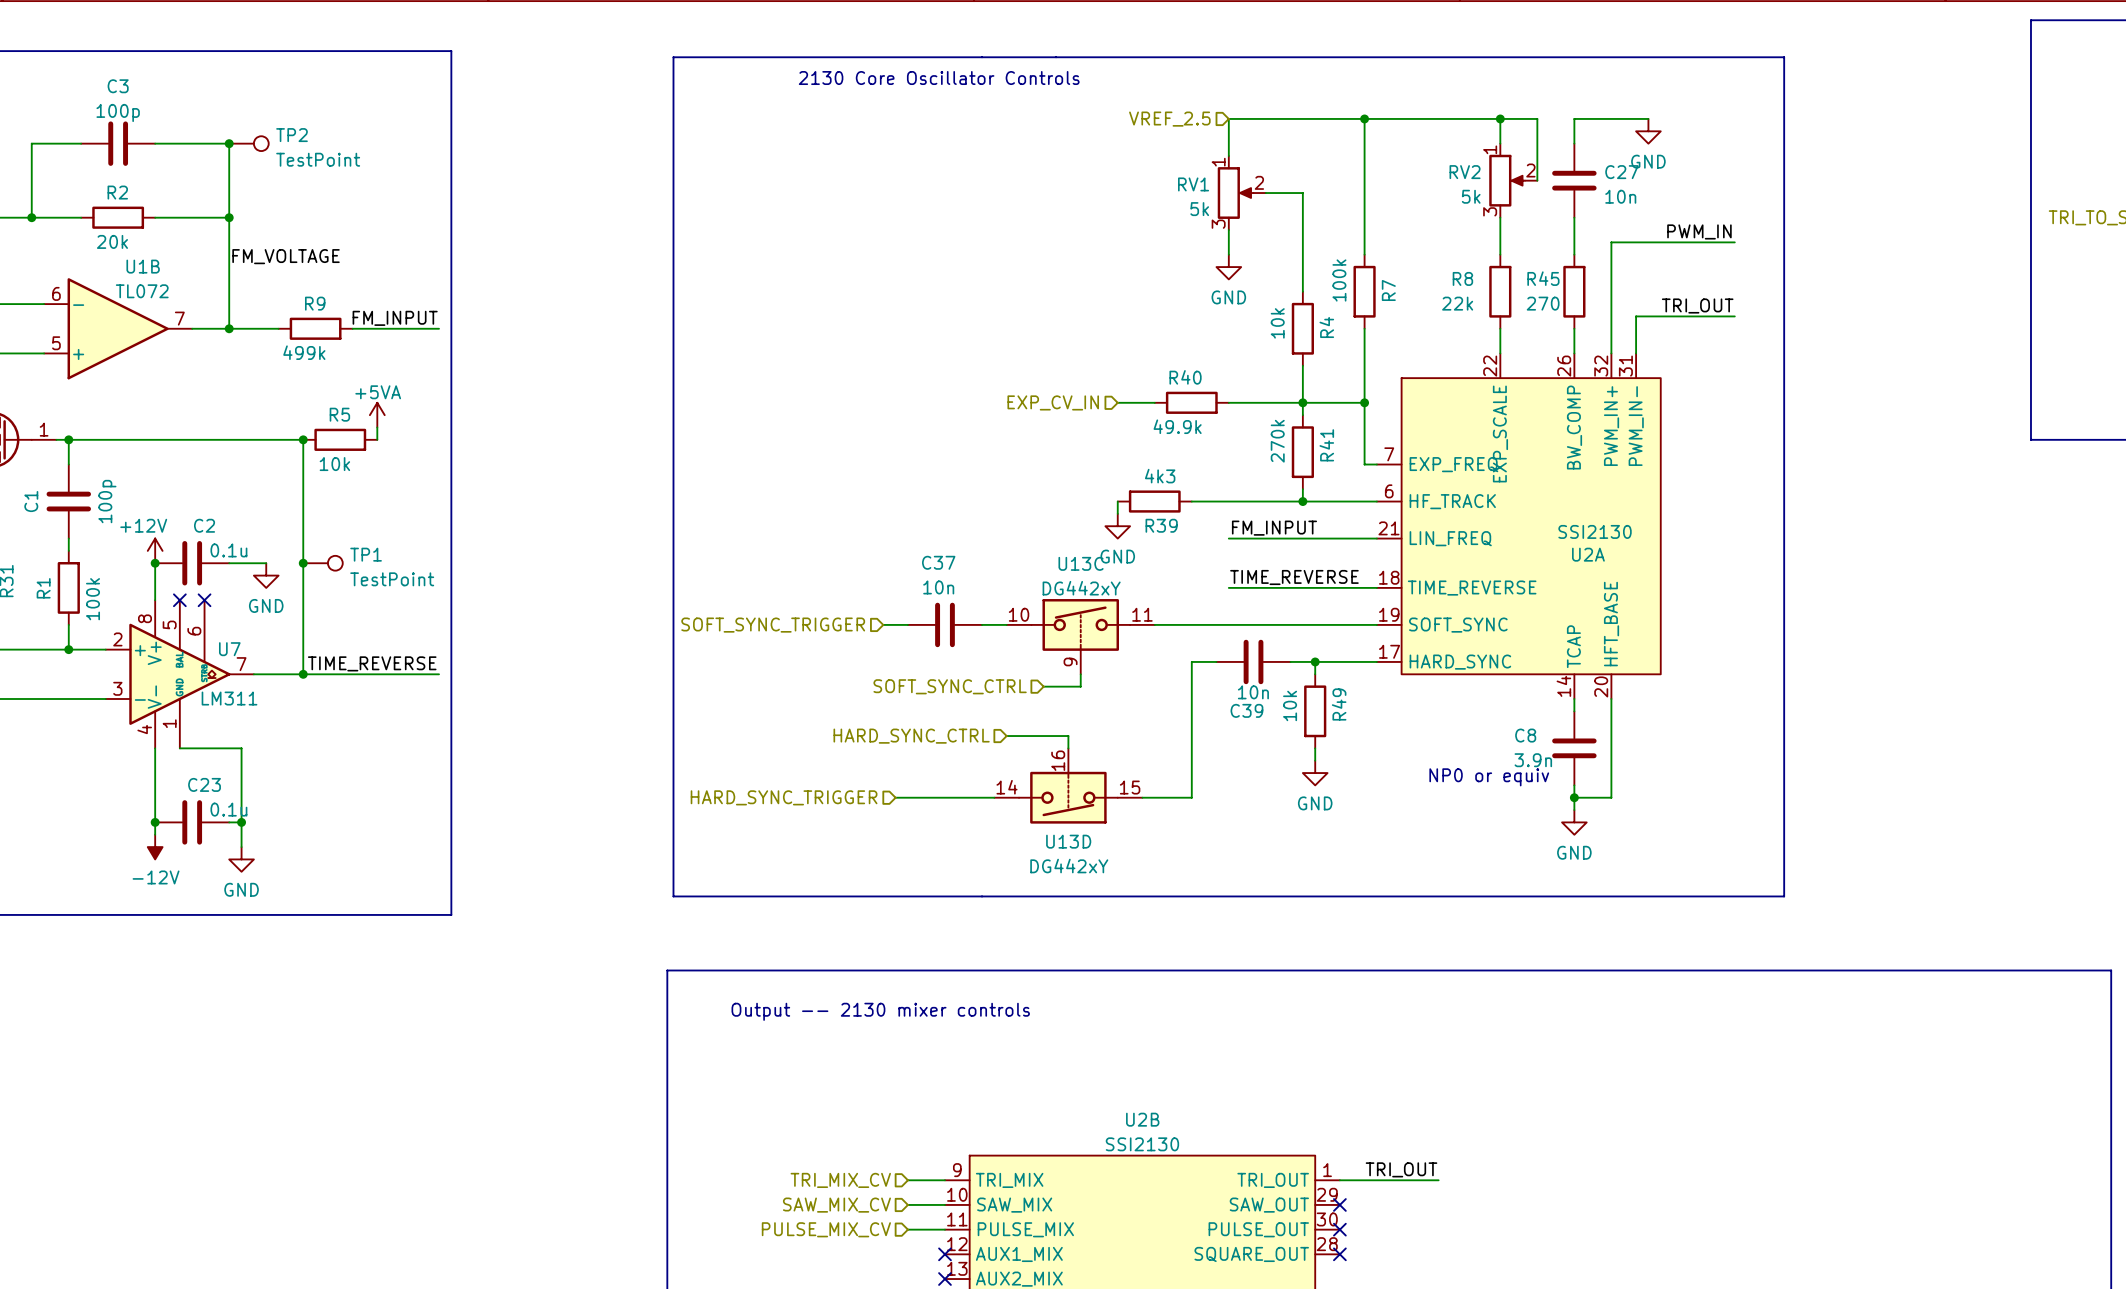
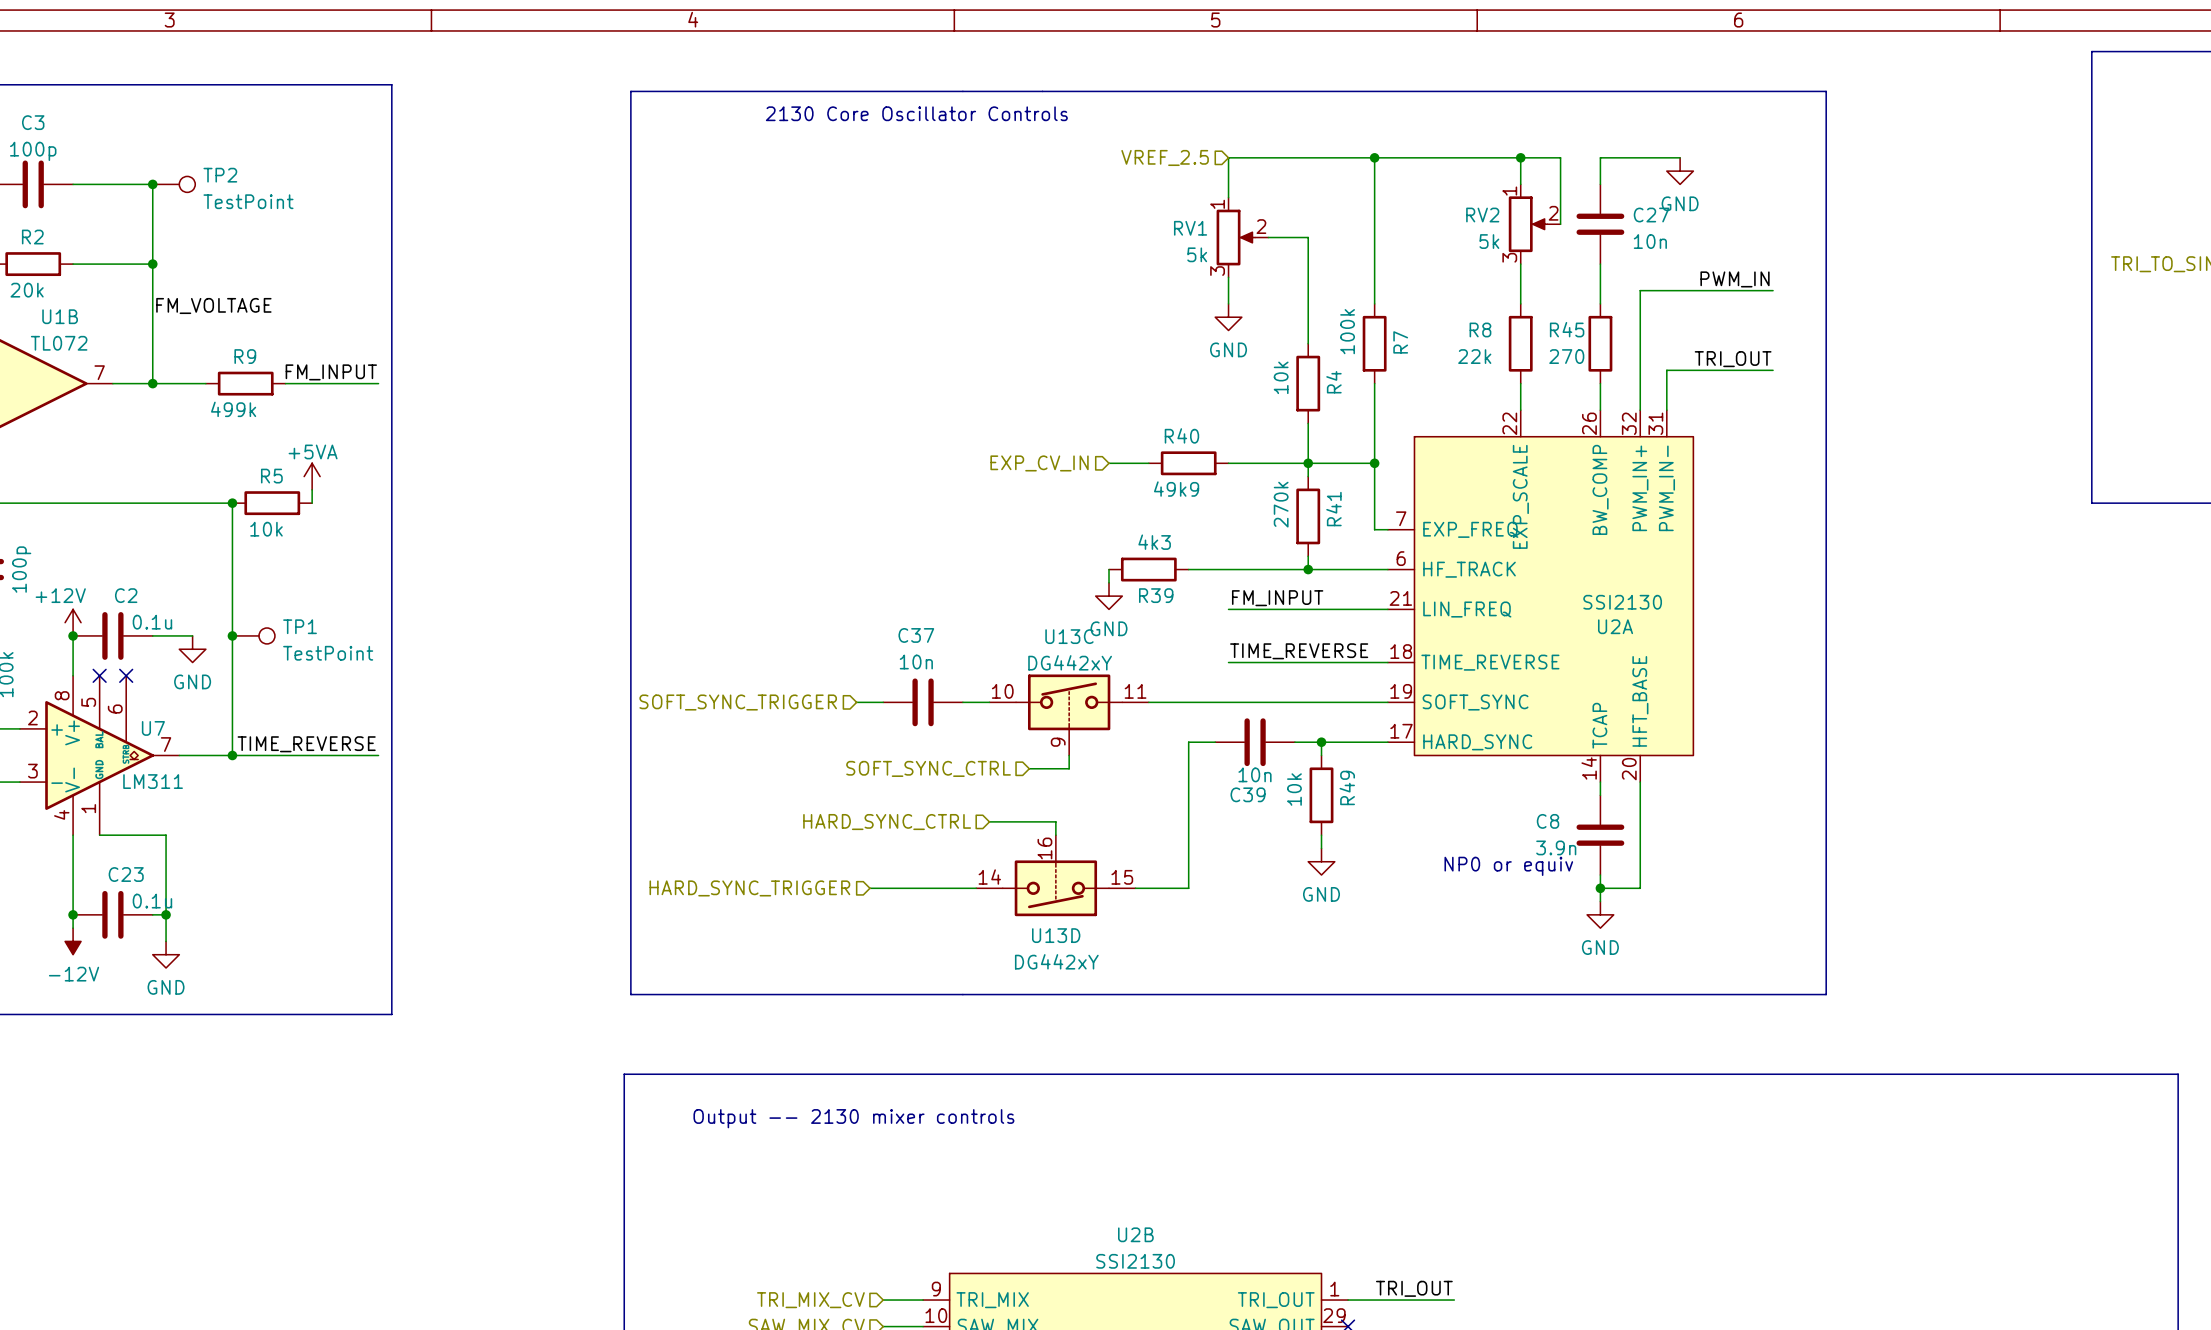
R40 value: 49.9k (1177, 426) -> 49k9 (1176, 489)

